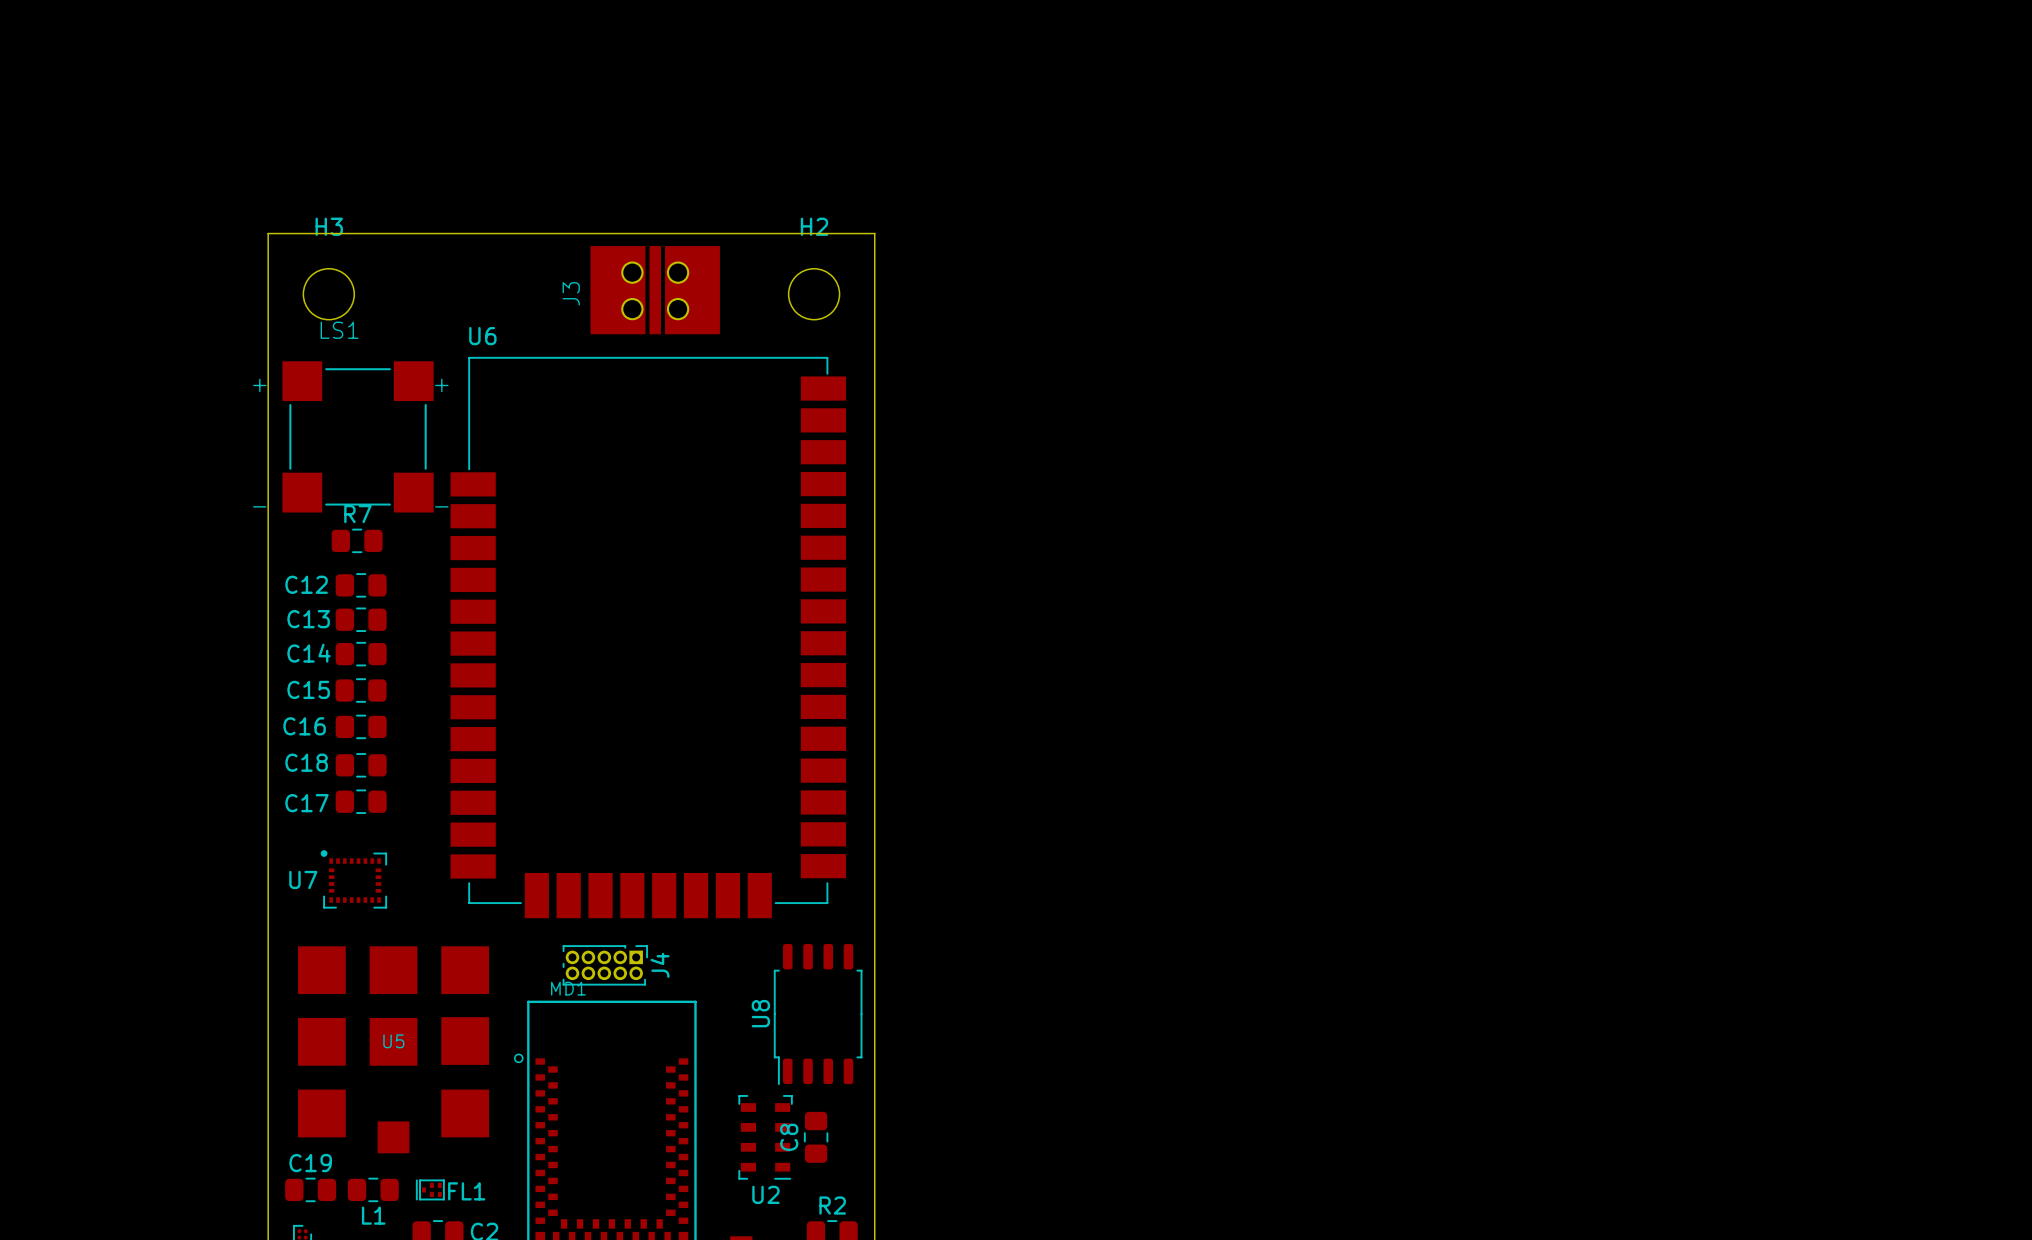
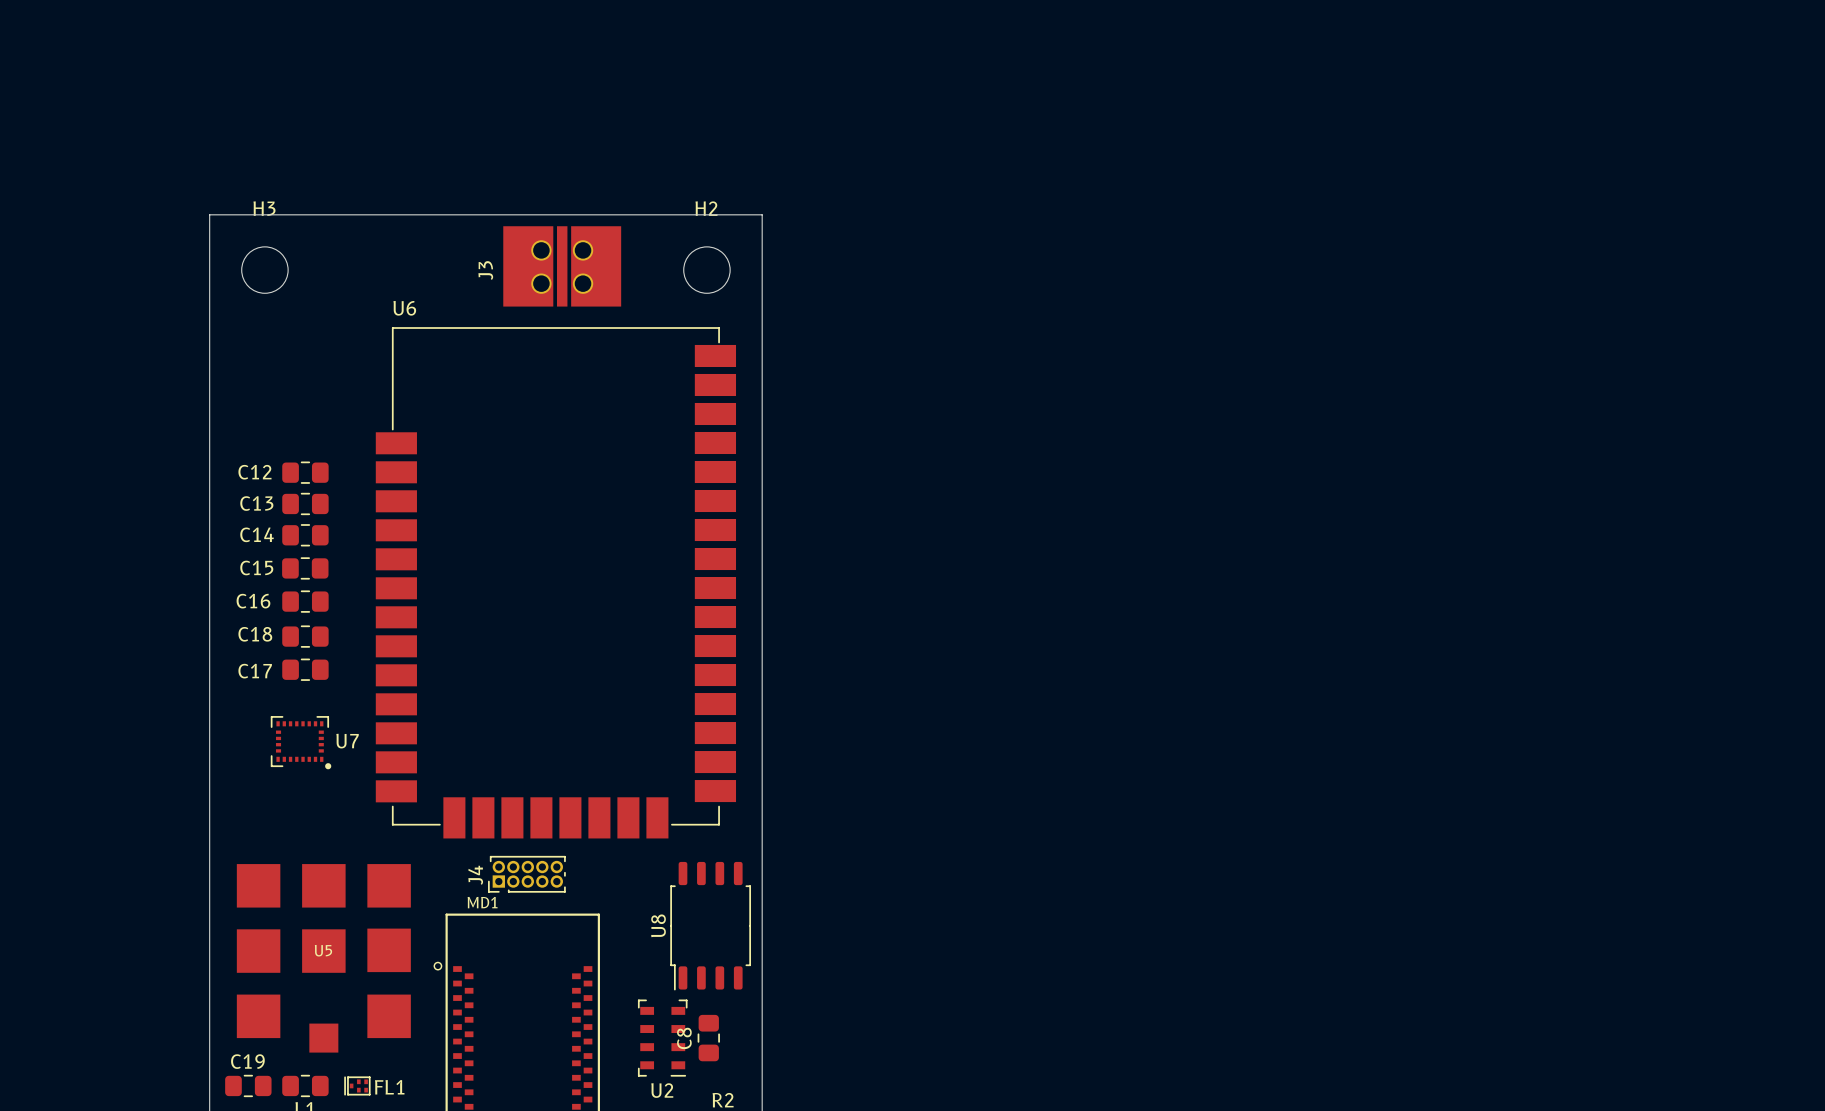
LS1: (358, 436) -> none
R7: (357, 540) -> none
C12 position: (361, 585) -> (305, 472)
C13 position: (361, 619) -> (305, 503)
C14 position: (361, 654) -> (305, 535)
C15 position: (361, 690) -> (305, 568)
C16 position: (361, 726) -> (305, 601)
C18 position: (361, 765) -> (305, 636)
C17 position: (361, 801) -> (305, 669)
U7 rotation: 0° (353, 879) -> 180° (301, 742)
U7 position: (353, 879) -> (301, 742)
J4 rotation: 0° (605, 965) -> 180° (526, 874)

